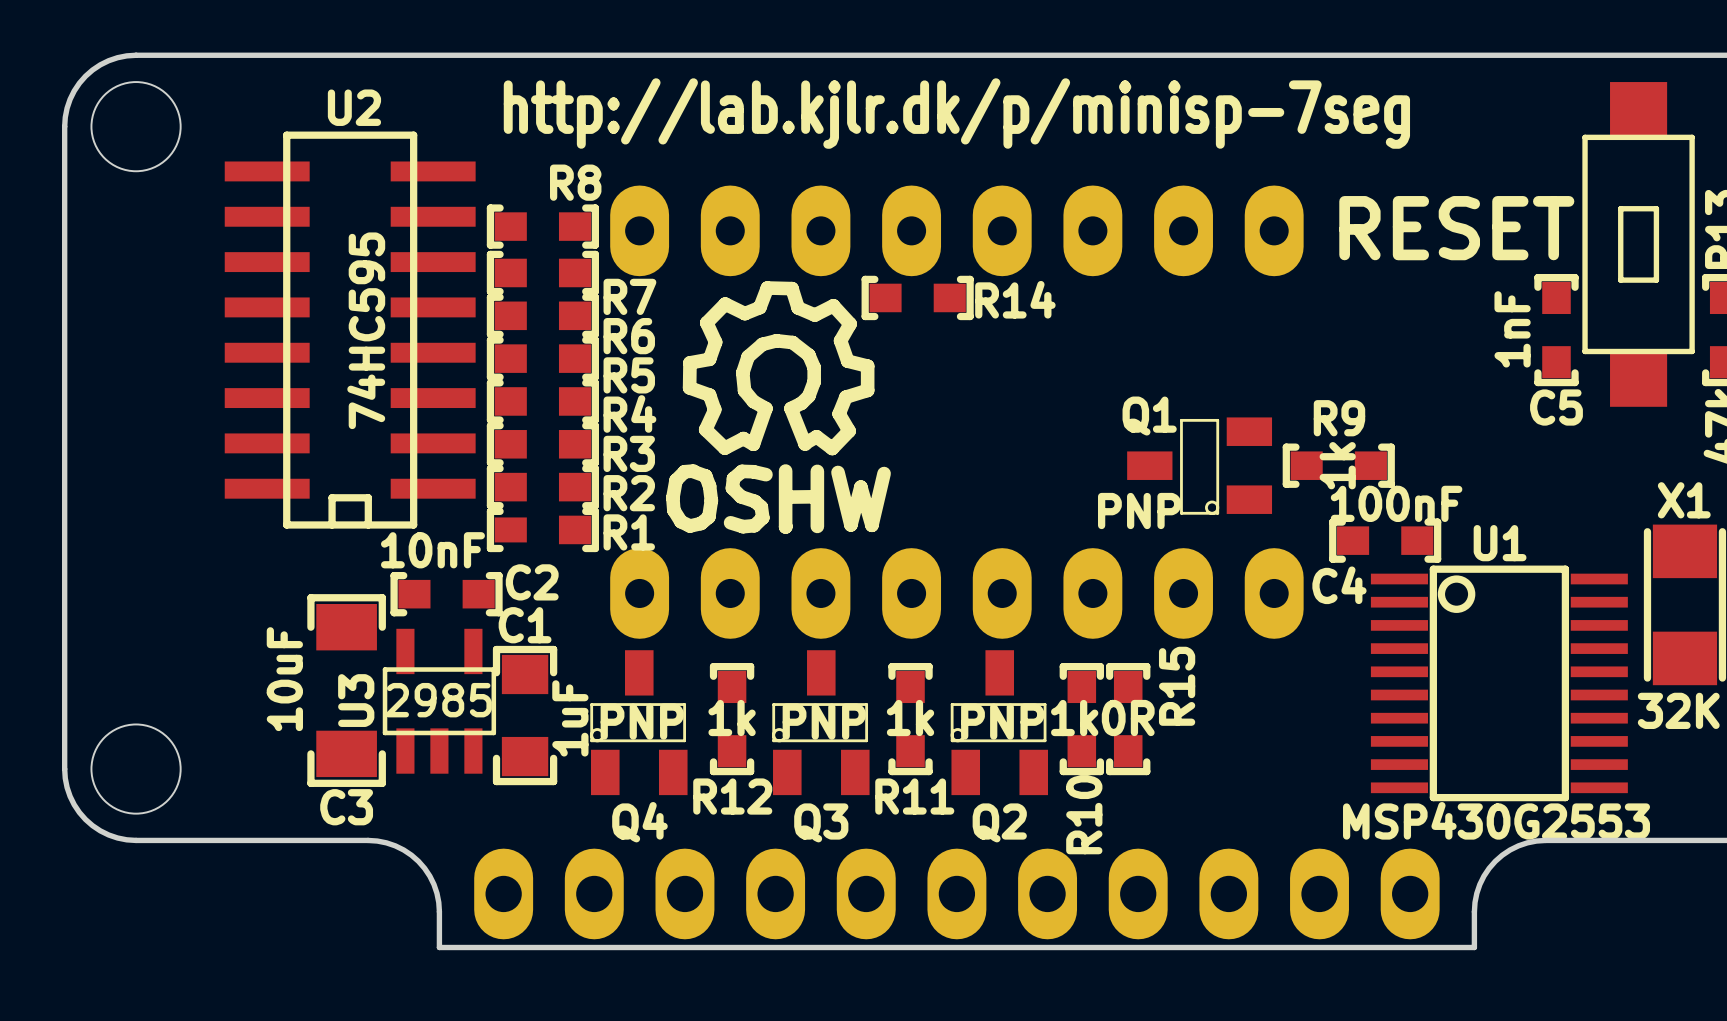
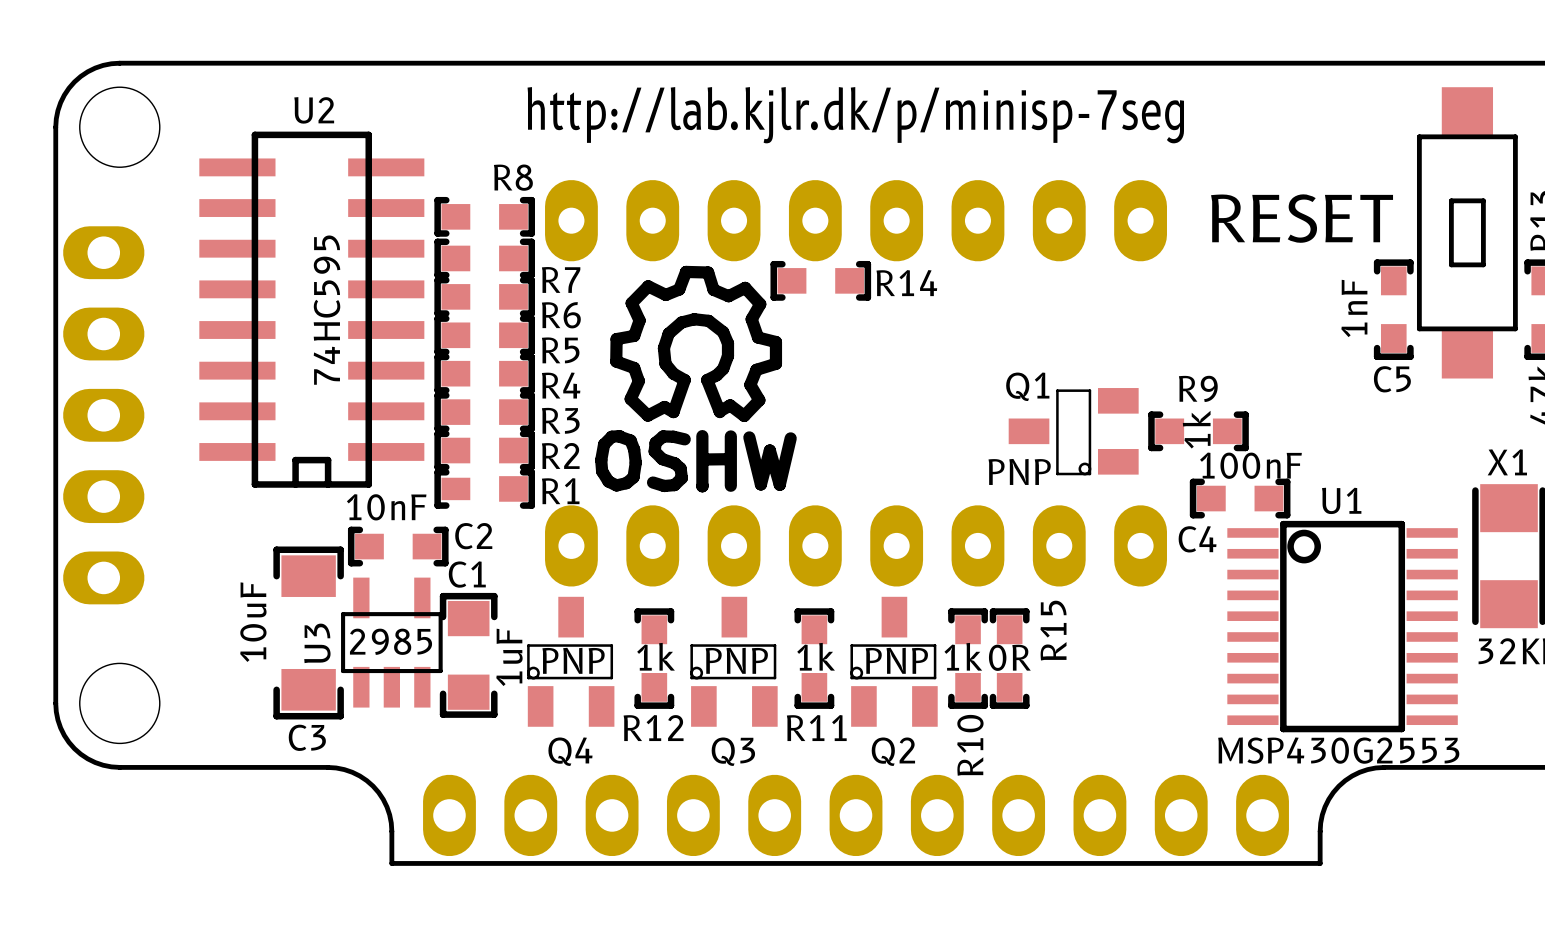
part: none -> (103, 415)

